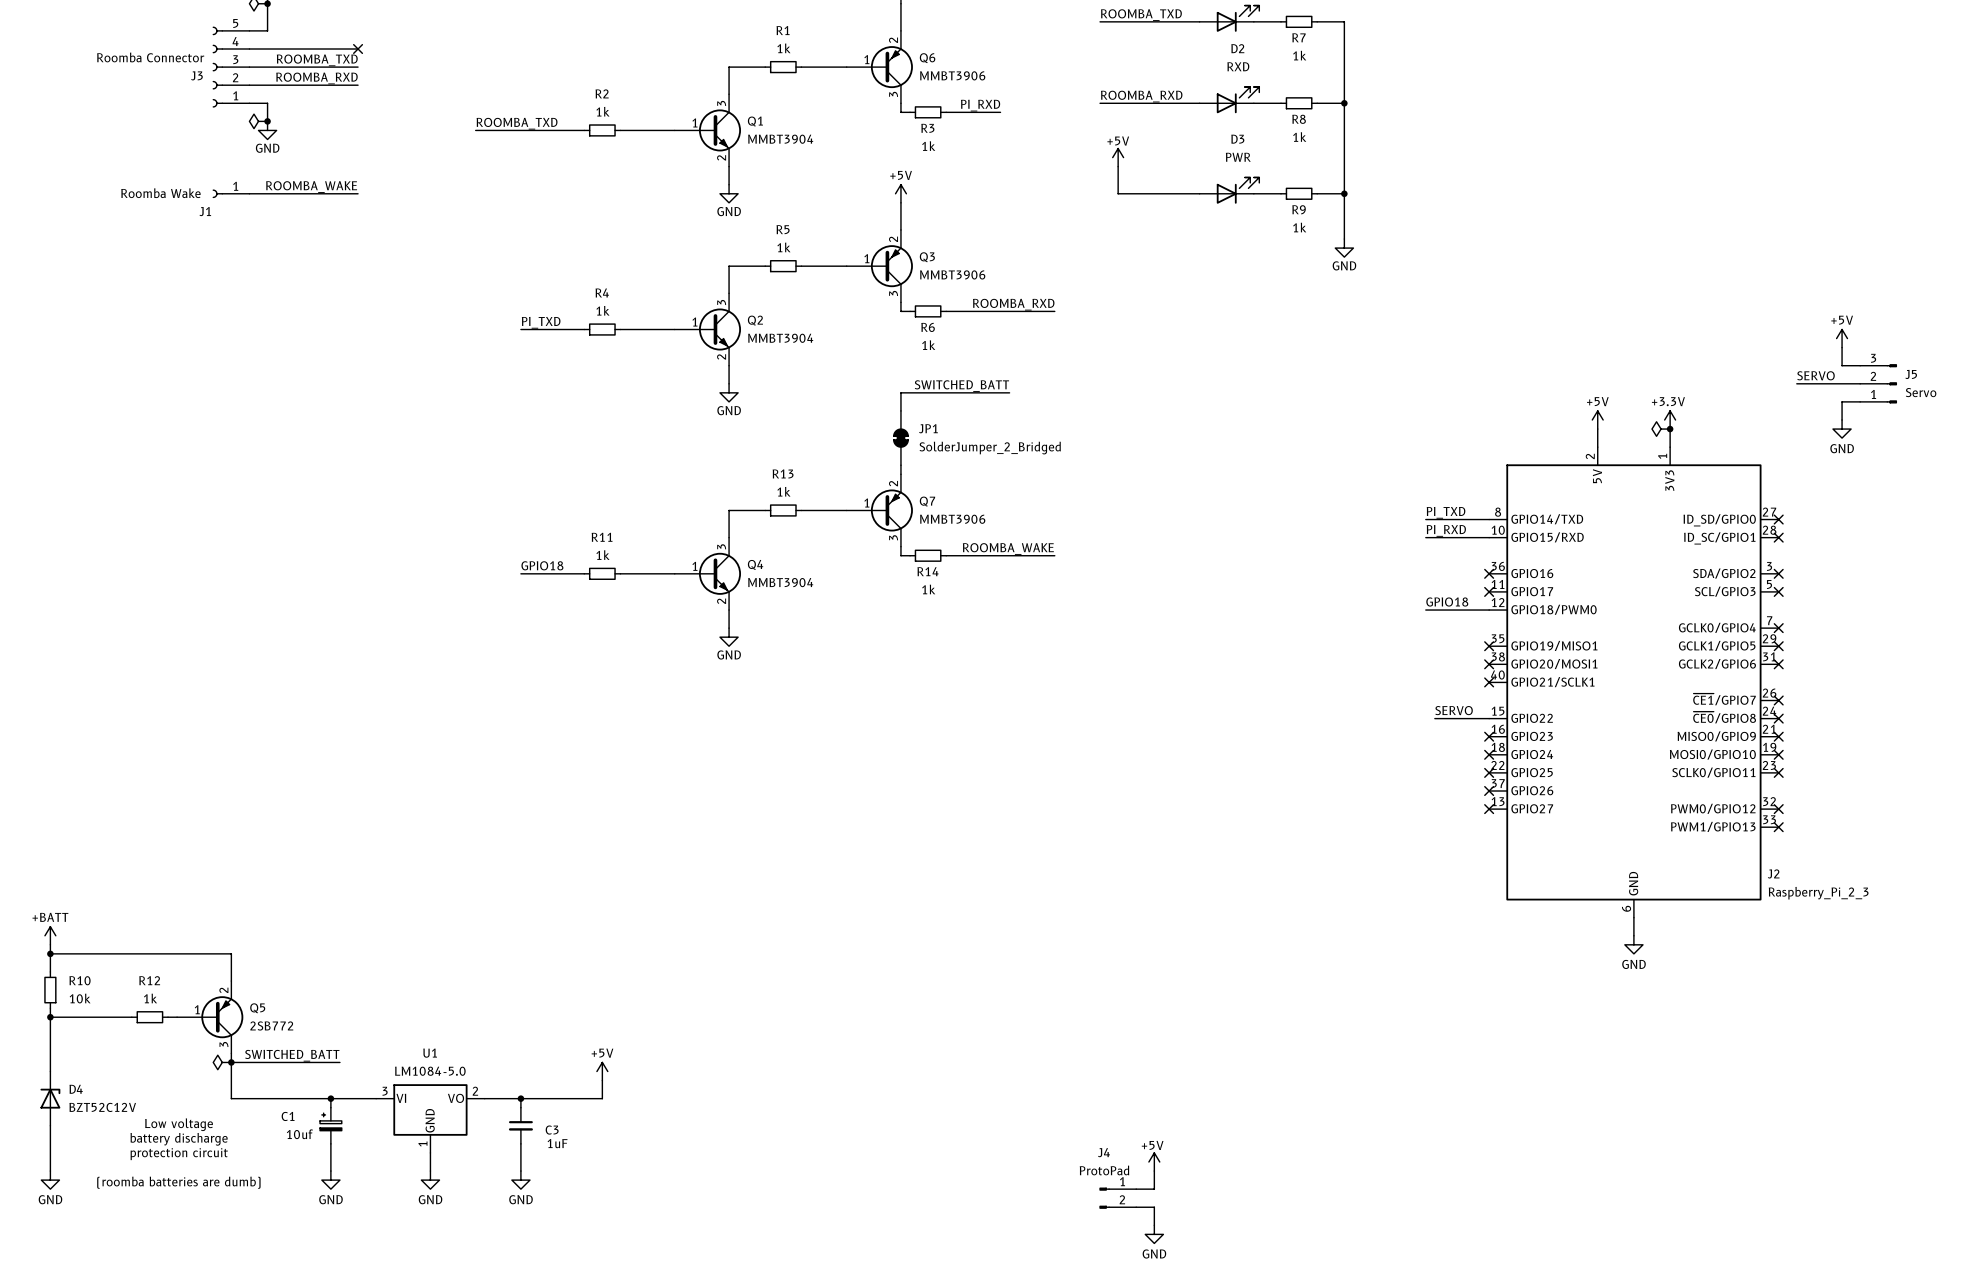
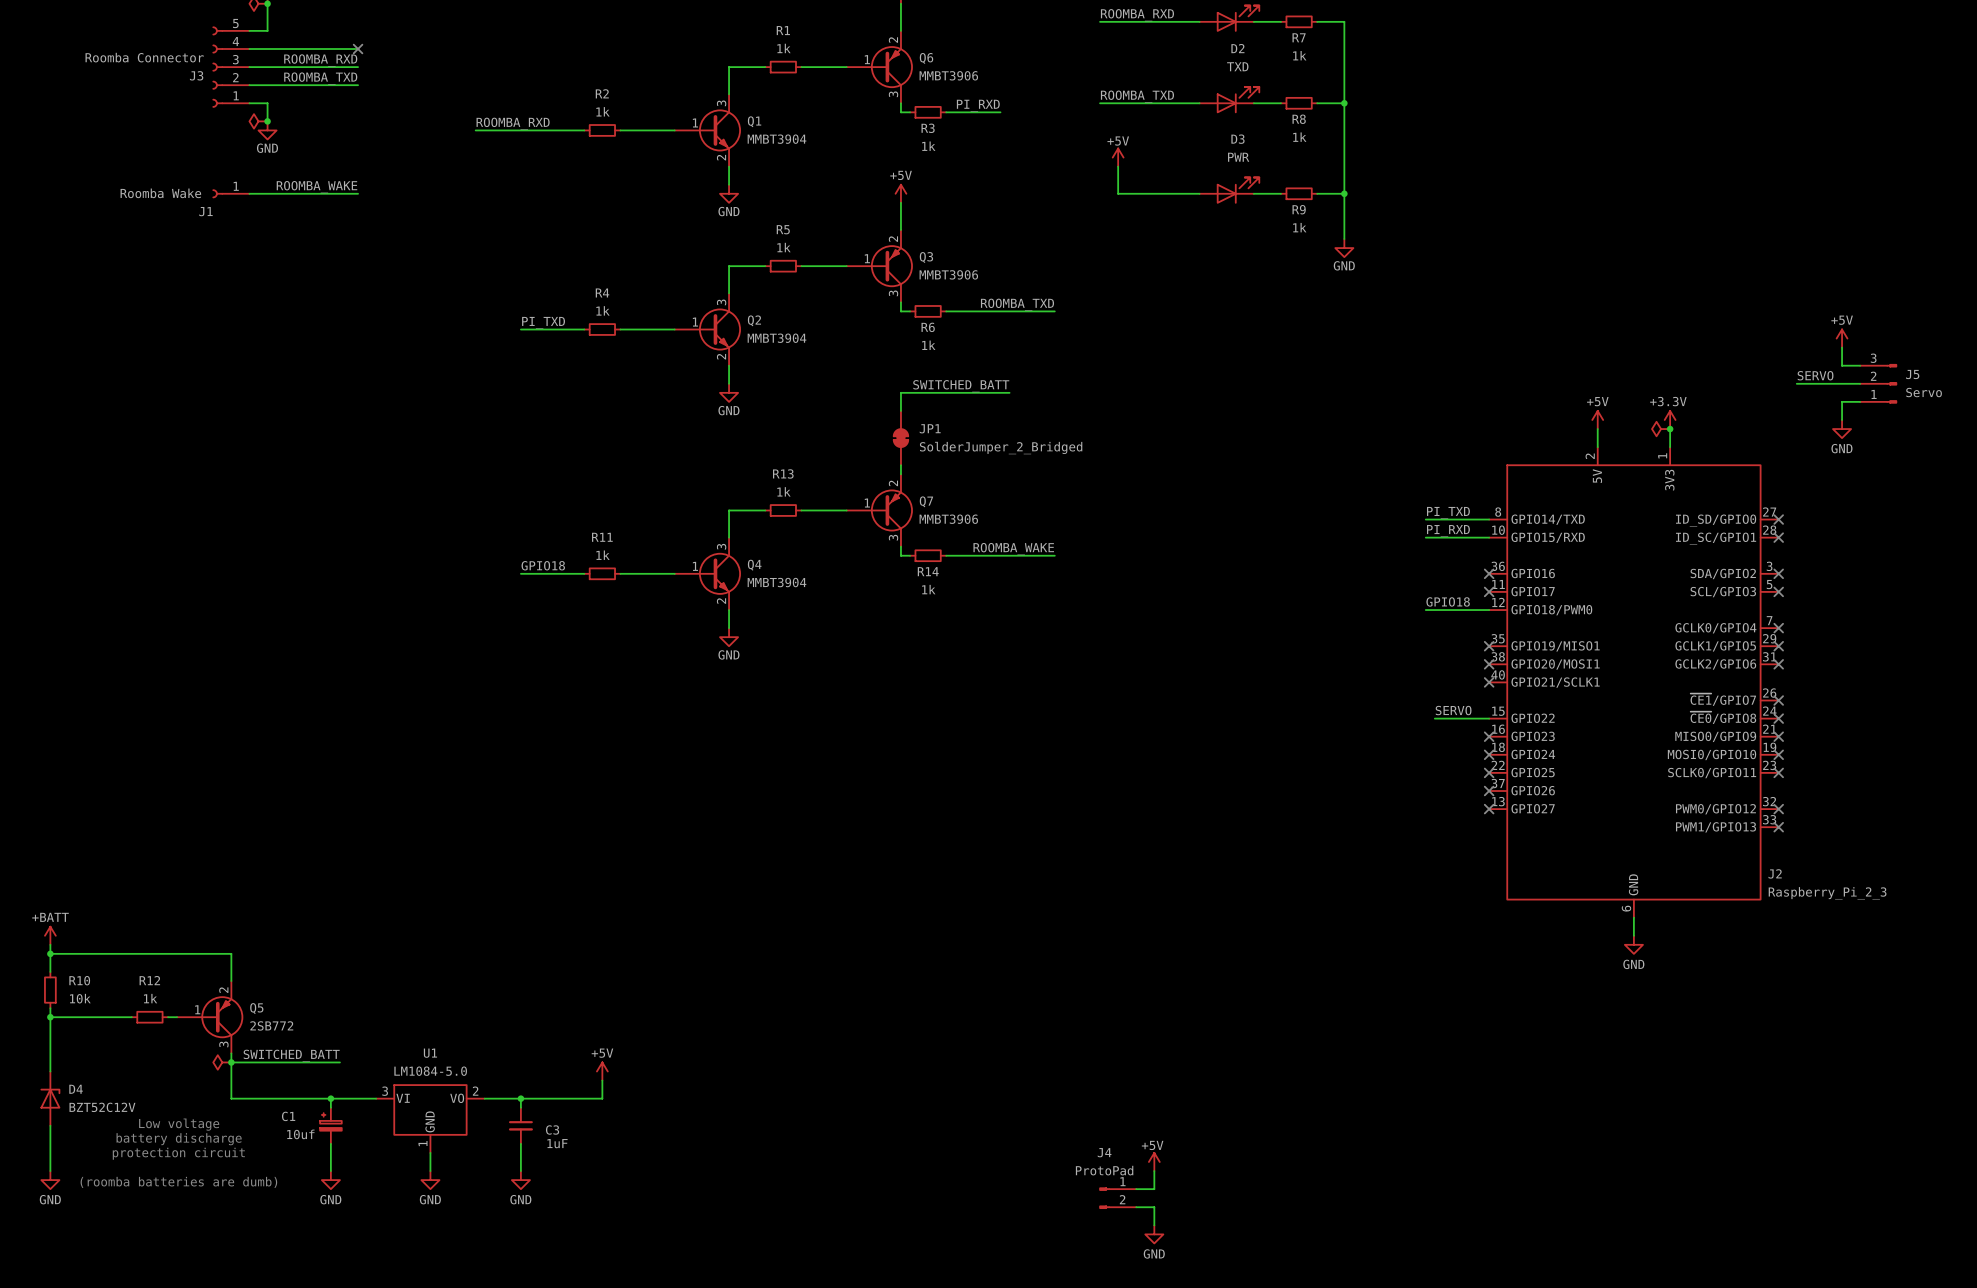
label: ROOMBA_TXD (1141, 15) -> ROOMBA_RXD (1137, 15)
label: ROOMBA_TXD (317, 60) -> ROOMBA_RXD (320, 60)
D2 value: RXD (1238, 66) -> TXD (1237, 66)
label: ROOMBA_RXD (316, 78) -> ROOMBA_TXD (320, 78)
label: ROOMBA_RXD (1141, 96) -> ROOMBA_TXD (1137, 96)
label: ROOMBA_TXD (517, 123) -> ROOMBA_RXD (513, 123)
label: ROOMBA_RXD (1013, 304) -> ROOMBA_TXD (1017, 304)

